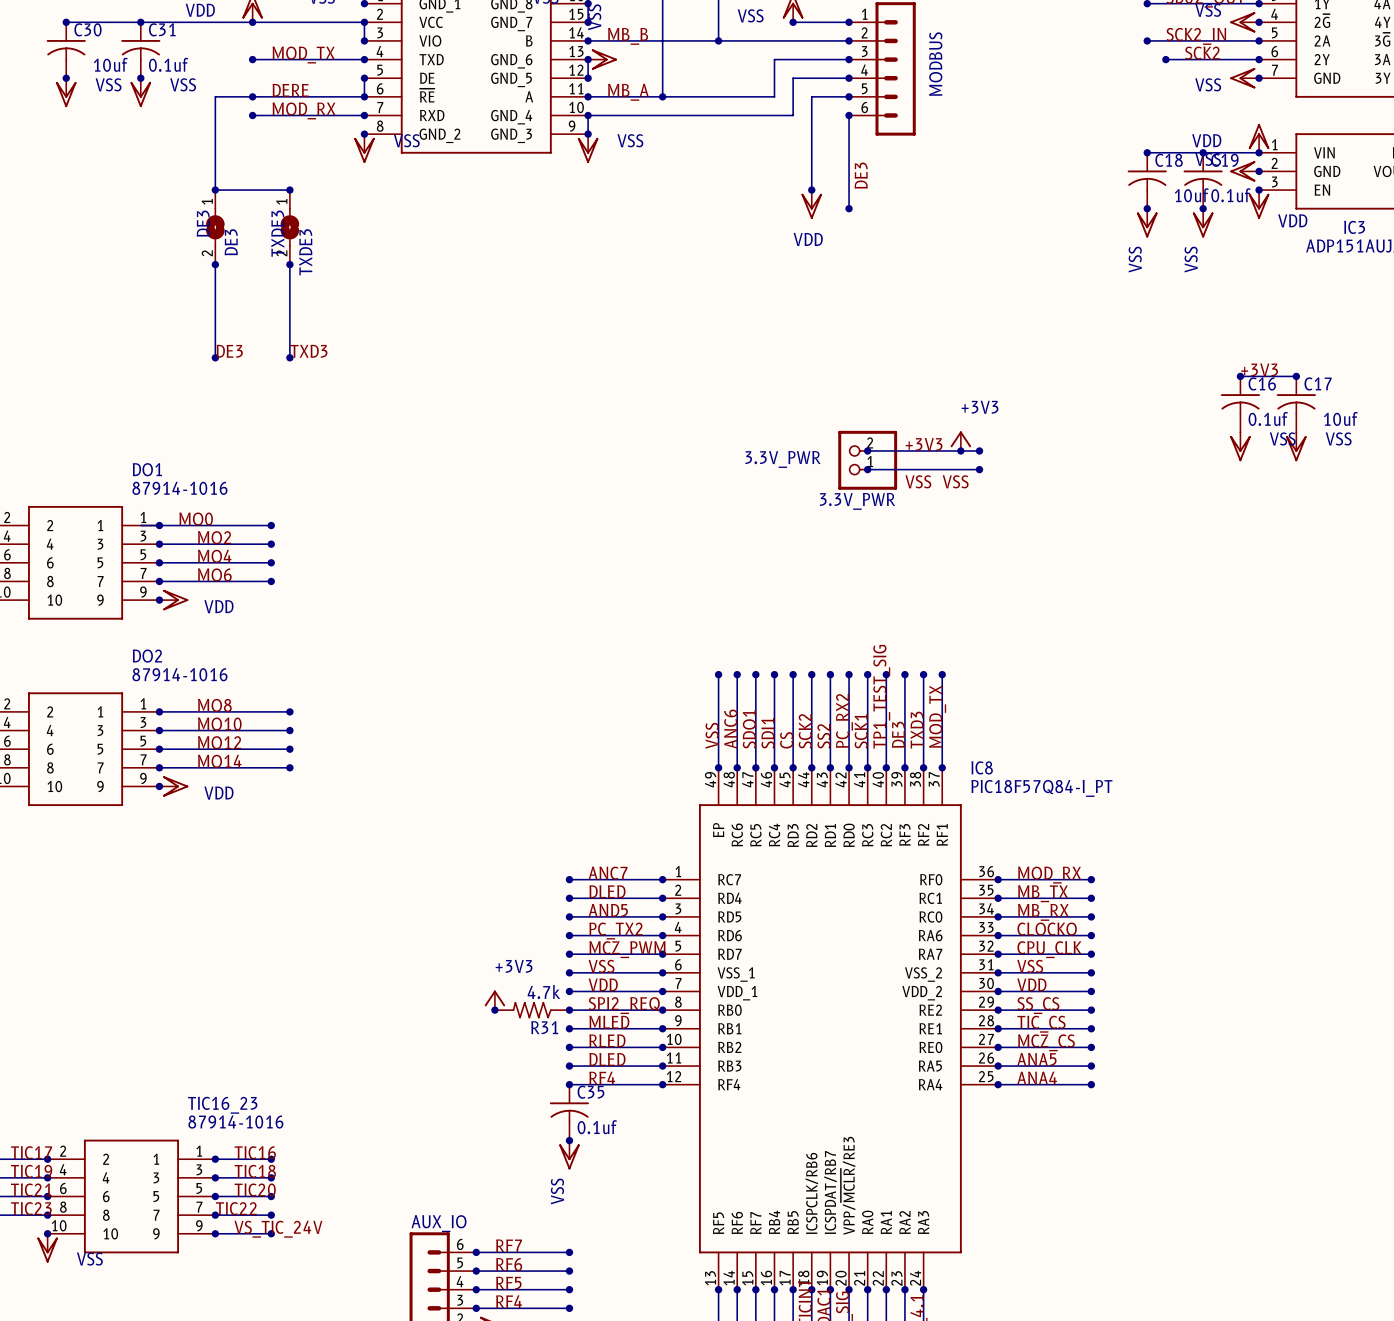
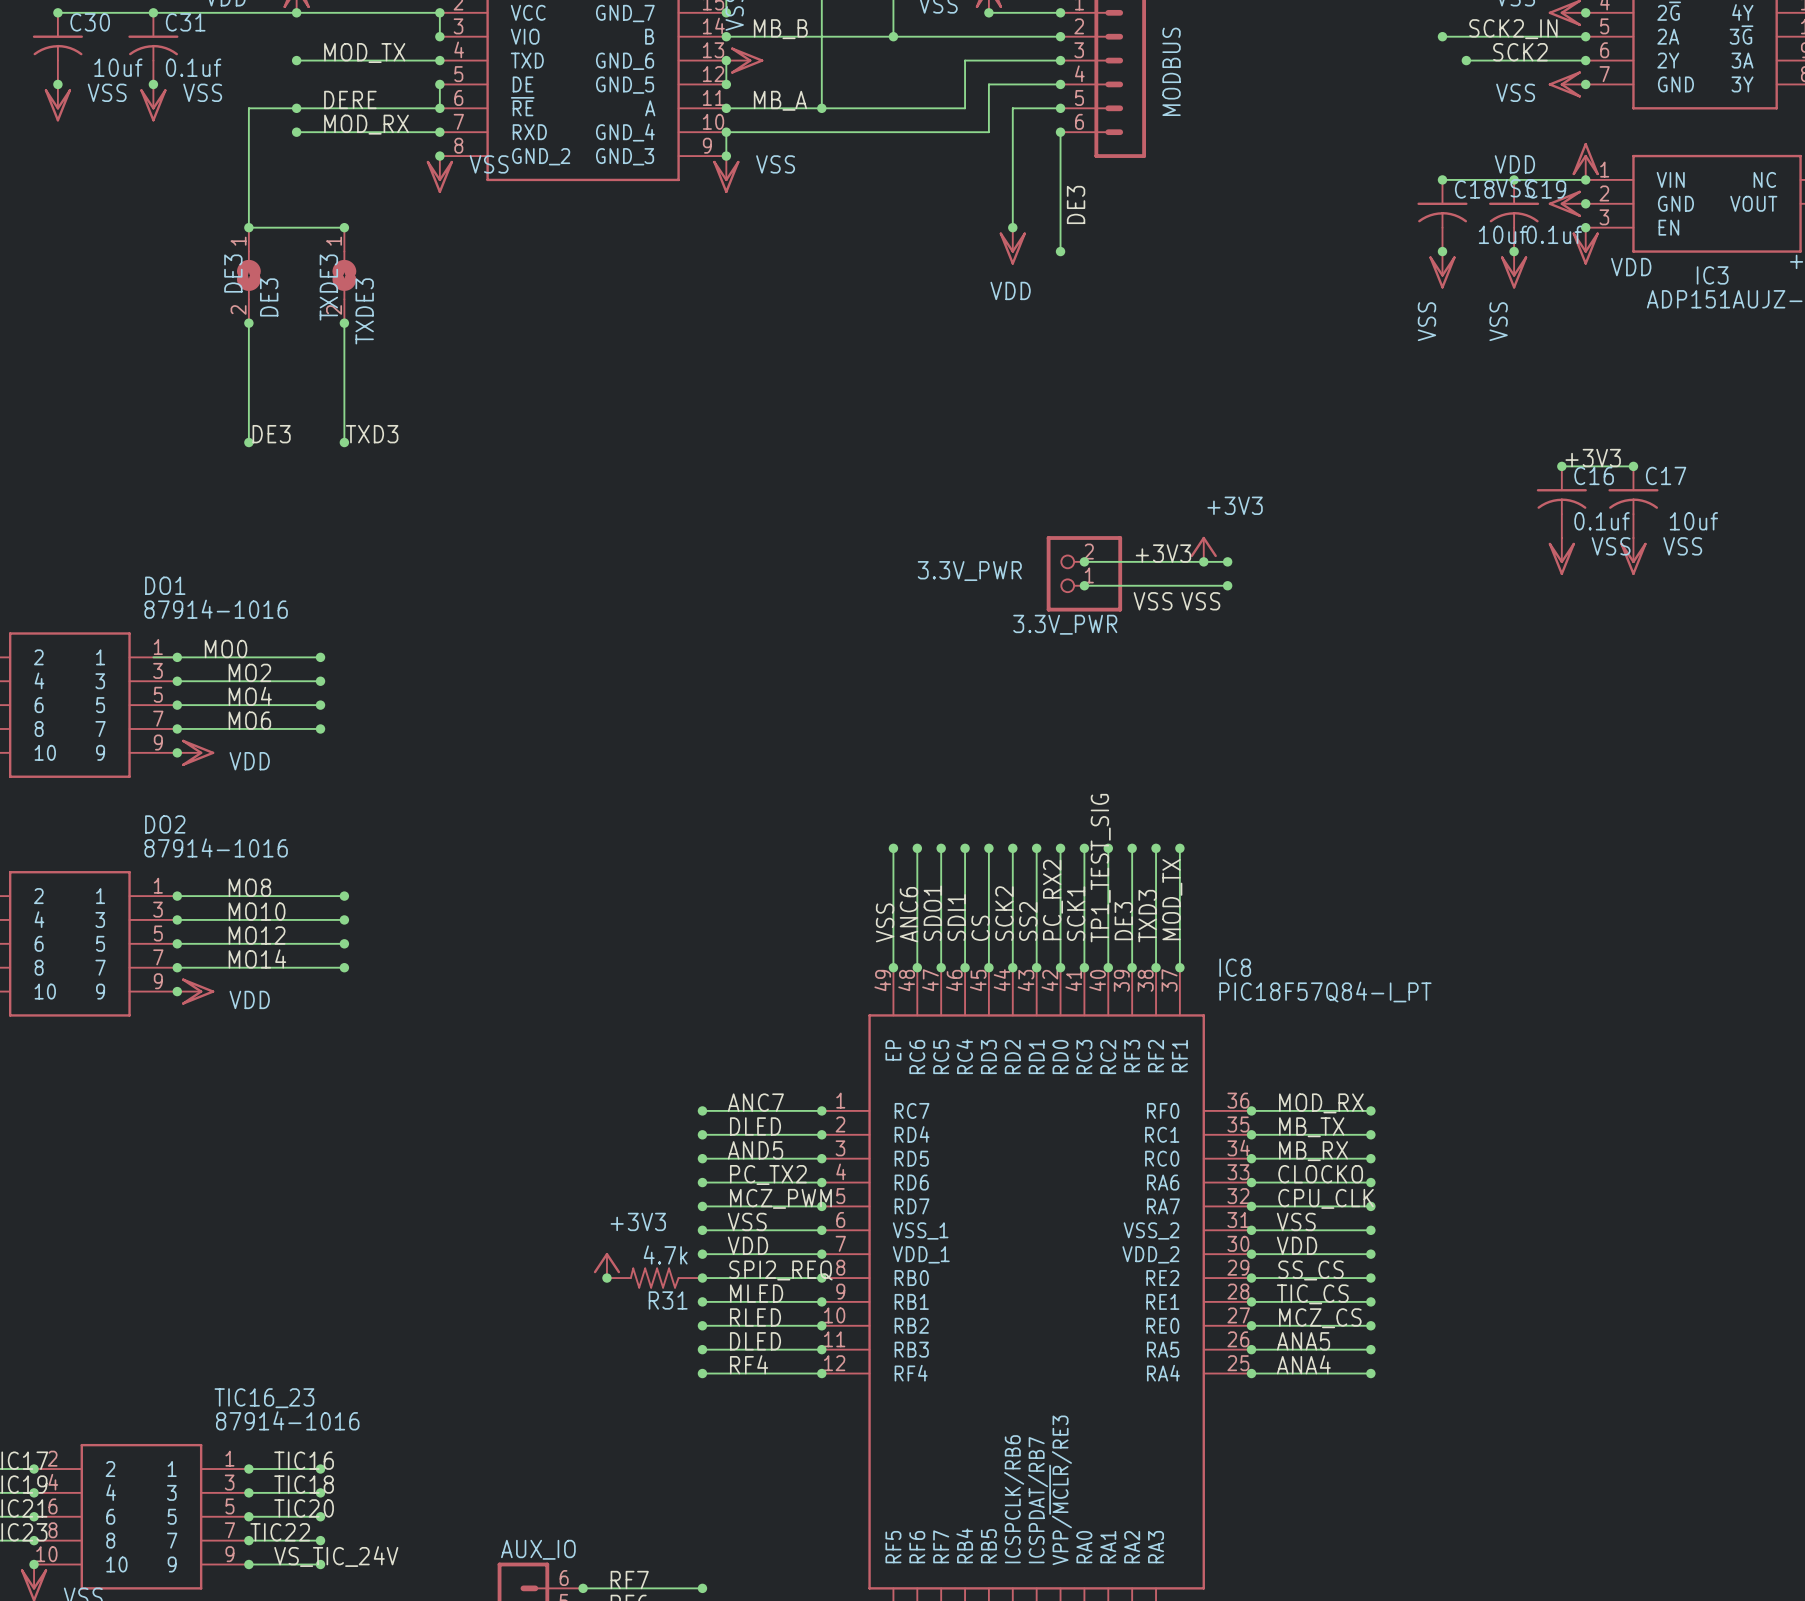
C35: 0.1uf (569, 1112) -> none
junction: (569, 1140) -> none
power symbol: VSS (569, 1155) -> none

